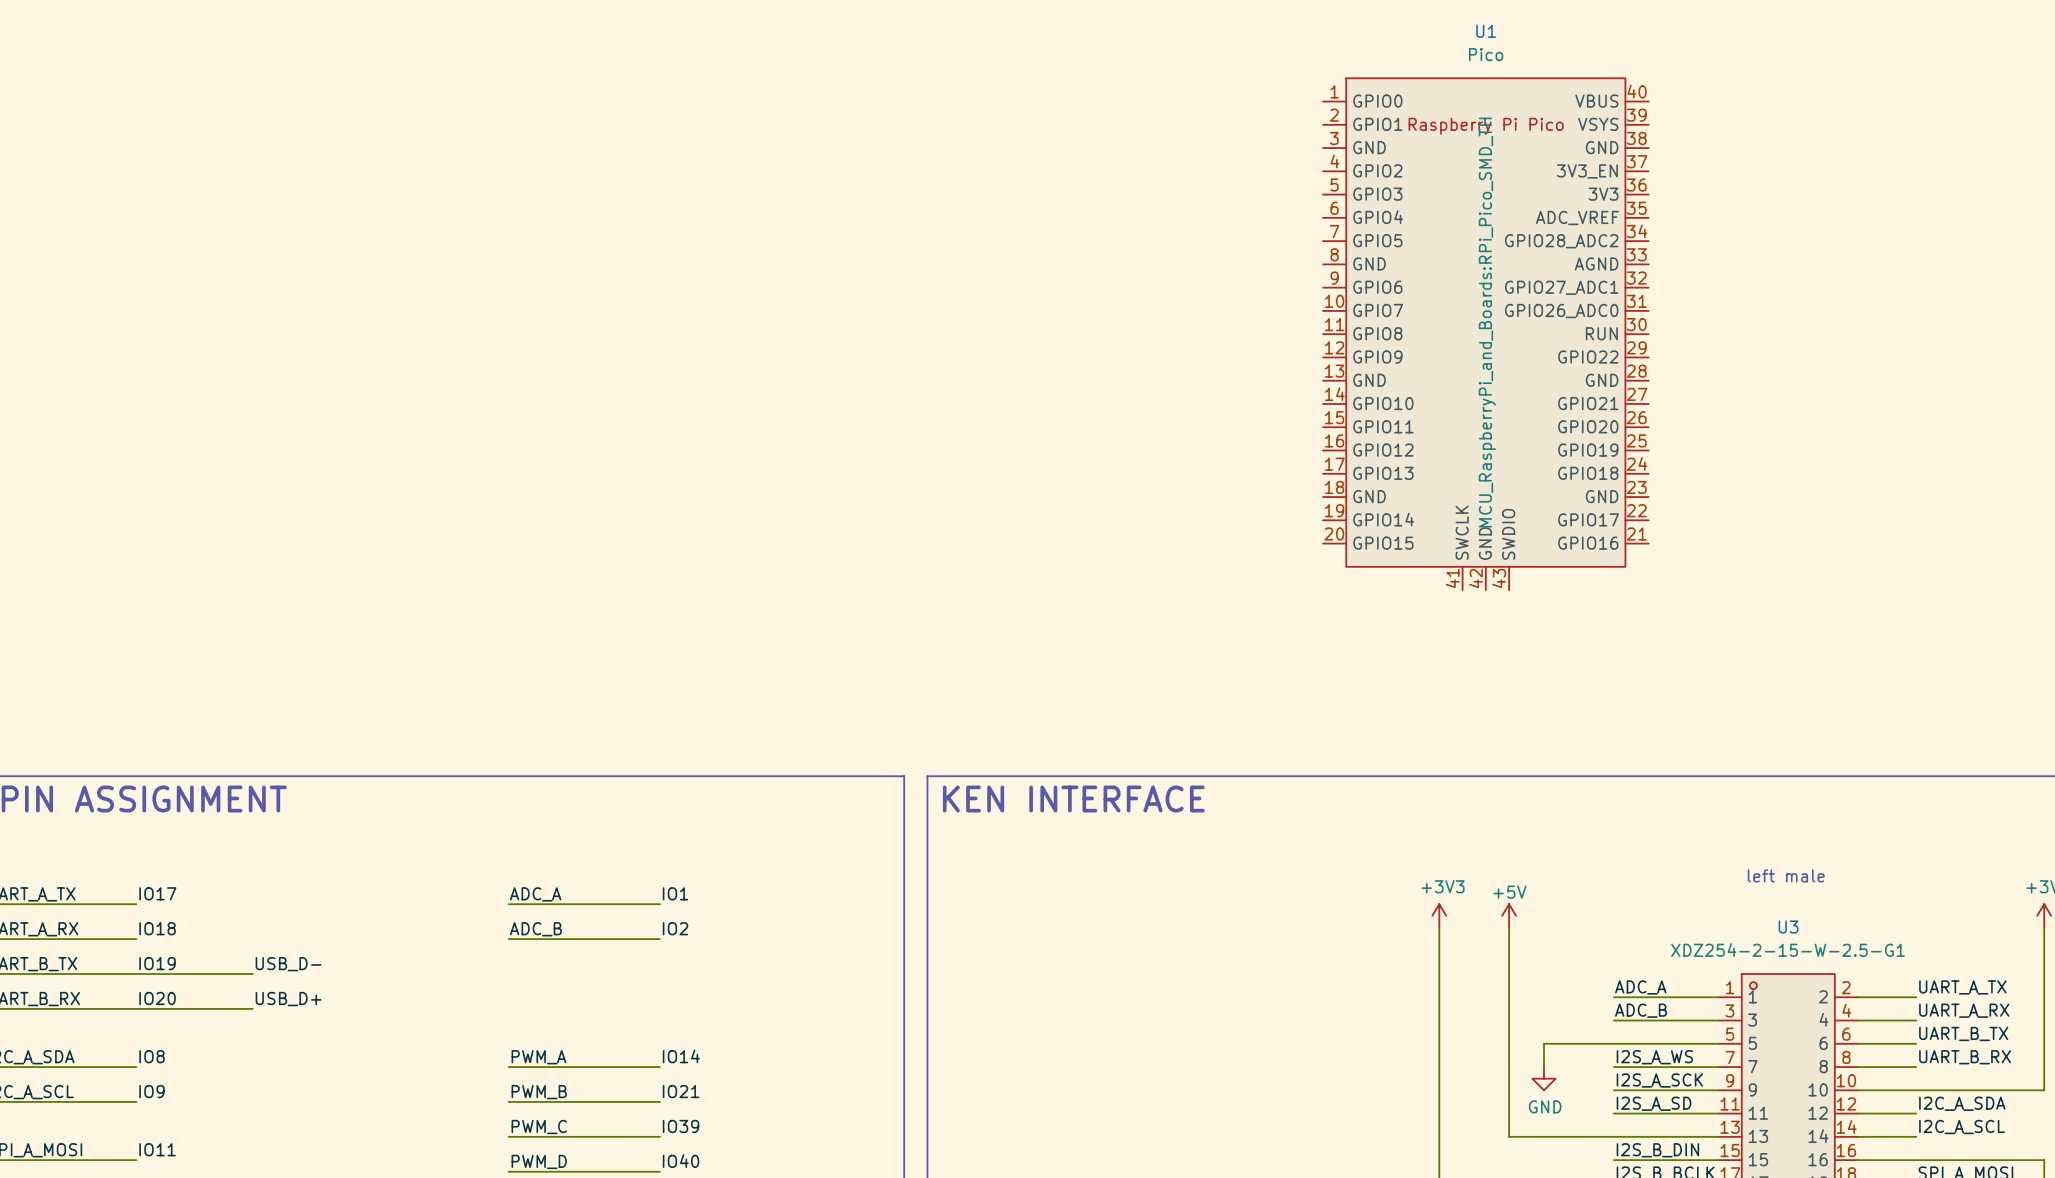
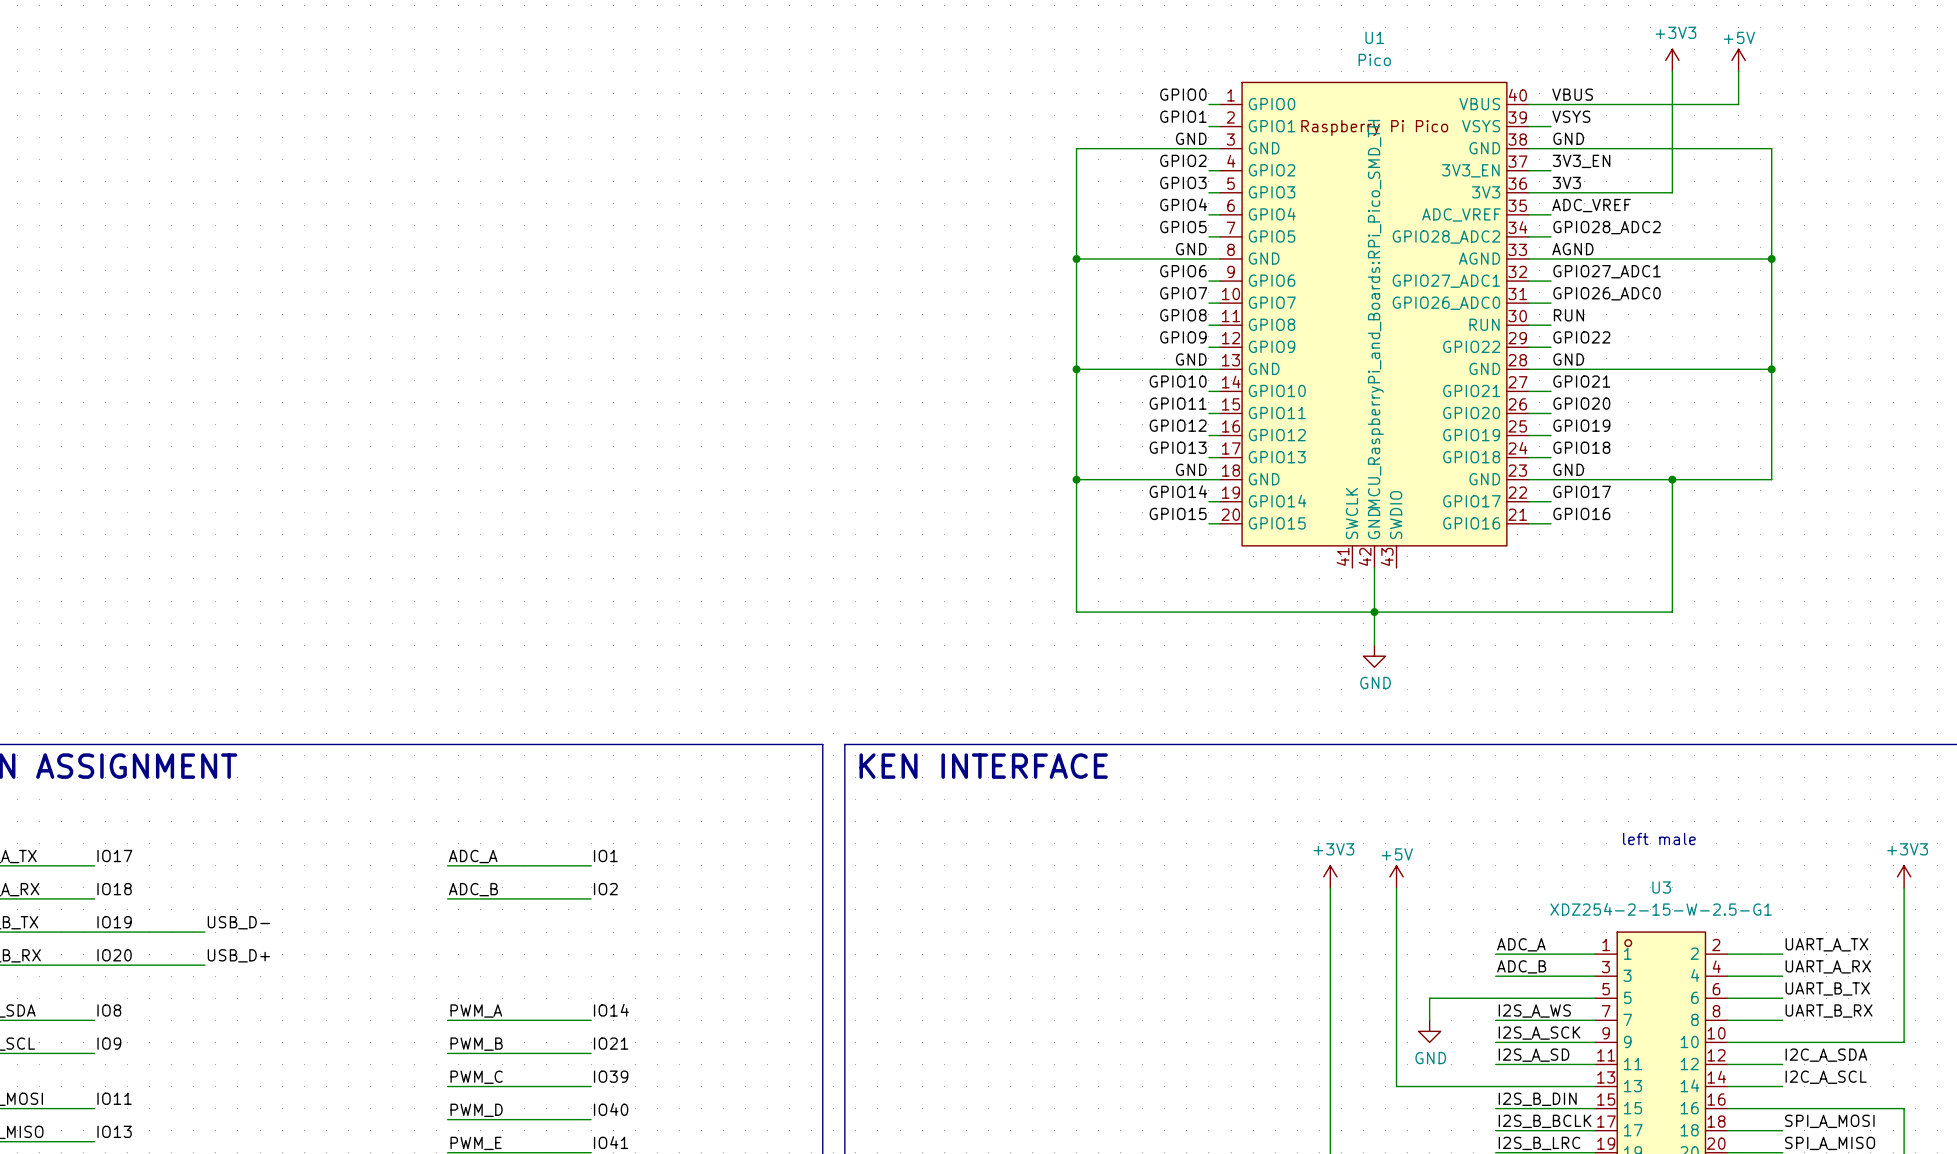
power symbol: none -> +3V3 (1672, 60)
power symbol: none -> +5V (1738, 60)
wire: none -> (1672, 71) (1672, 192) (1528, 192)
wire: none -> (1738, 71) (1738, 104) (1528, 104)
label: none -> GPIO0 (1183, 94)
label: none -> VBUS (1572, 94)
wire: none -> (1208, 104) (1219, 104)
label: none -> GPIO1 (1183, 116)
label: none -> VSYS (1571, 116)
wire: none -> (1208, 126) (1219, 126)
wire: none -> (1528, 126) (1551, 126)
label: none -> GND (1191, 138)
label: none -> GND (1568, 138)
wire: none -> (1219, 148) (1076, 148) (1076, 612) (1672, 612) (1672, 479)
wire: none -> (1528, 148) (1771, 148) (1771, 479) (1528, 479)
label: none -> GPIO2 (1183, 160)
label: none -> 3V3_EN (1581, 161)
wire: none -> (1208, 170) (1219, 170)
wire: none -> (1528, 170) (1551, 170)
label: none -> GPIO3 (1183, 182)
label: none -> 3V3 (1566, 182)
wire: none -> (1208, 192) (1219, 192)
label: none -> GPIO4 (1183, 204)
label: none -> ADC_VREF (1591, 205)
wire: none -> (1208, 214) (1219, 214)
wire: none -> (1528, 214) (1551, 214)
label: none -> GPIO5 (1183, 227)
label: none -> GPIO28_ADC2 (1607, 227)
wire: none -> (1208, 236) (1219, 236)
wire: none -> (1528, 236) (1551, 236)
label: none -> GND (1191, 249)
label: none -> AGND (1572, 249)
wire: none -> (1076, 258) (1219, 258)
junction: none -> (1076, 258)
wire: none -> (1528, 258) (1771, 258)
junction: none -> (1771, 258)
label: none -> GPIO6 (1183, 271)
label: none -> GPIO27_ADC1 (1607, 271)
wire: none -> (1208, 281) (1219, 281)
wire: none -> (1528, 281) (1551, 281)
label: none -> GPIO7 (1183, 293)
label: none -> GPIO26_ADC0 (1607, 293)
wire: none -> (1208, 303) (1219, 303)
wire: none -> (1528, 303) (1551, 303)
label: none -> GPIO8 (1183, 315)
label: none -> RUN (1568, 315)
wire: none -> (1208, 325) (1219, 325)
wire: none -> (1528, 325) (1551, 325)
label: none -> GPIO9 (1183, 337)
label: none -> GPIO22 (1581, 337)
wire: none -> (1208, 347) (1219, 347)
wire: none -> (1528, 347) (1551, 347)
label: none -> GND (1191, 359)
label: none -> GND (1568, 359)
wire: none -> (1076, 369) (1219, 369)
junction: none -> (1076, 369)
wire: none -> (1528, 369) (1771, 369)
junction: none -> (1771, 369)
label: none -> GPIO10 (1178, 381)
label: none -> GPIO21 (1581, 381)
wire: none -> (1208, 391) (1219, 391)
wire: none -> (1528, 391) (1551, 391)
label: none -> GPIO11 (1178, 403)
label: none -> GPIO20 (1581, 403)
wire: none -> (1208, 413) (1219, 413)
wire: none -> (1528, 413) (1551, 413)
label: none -> GPIO12 (1178, 425)
label: none -> GPIO19 (1581, 425)
wire: none -> (1208, 435) (1219, 435)
wire: none -> (1528, 435) (1551, 435)
label: none -> GPIO13 (1178, 447)
label: none -> GPIO18 (1581, 447)
wire: none -> (1208, 457) (1219, 457)
wire: none -> (1528, 457) (1551, 457)
label: none -> GND (1191, 469)
label: none -> GND (1568, 469)
wire: none -> (1076, 479) (1219, 479)
junction: none -> (1076, 479)
junction: none -> (1672, 479)
label: none -> GPIO14 (1178, 491)
label: none -> GPIO17 (1582, 491)
wire: none -> (1208, 501) (1219, 501)
wire: none -> (1528, 501) (1551, 501)
label: none -> GPIO15 (1178, 513)
label: none -> GPIO16 (1581, 513)
wire: none -> (1208, 523) (1219, 523)
wire: none -> (1528, 523) (1551, 523)
wire: none -> (1374, 567) (1374, 645)
junction: none -> (1374, 612)
power symbol: none -> GND (1374, 656)

